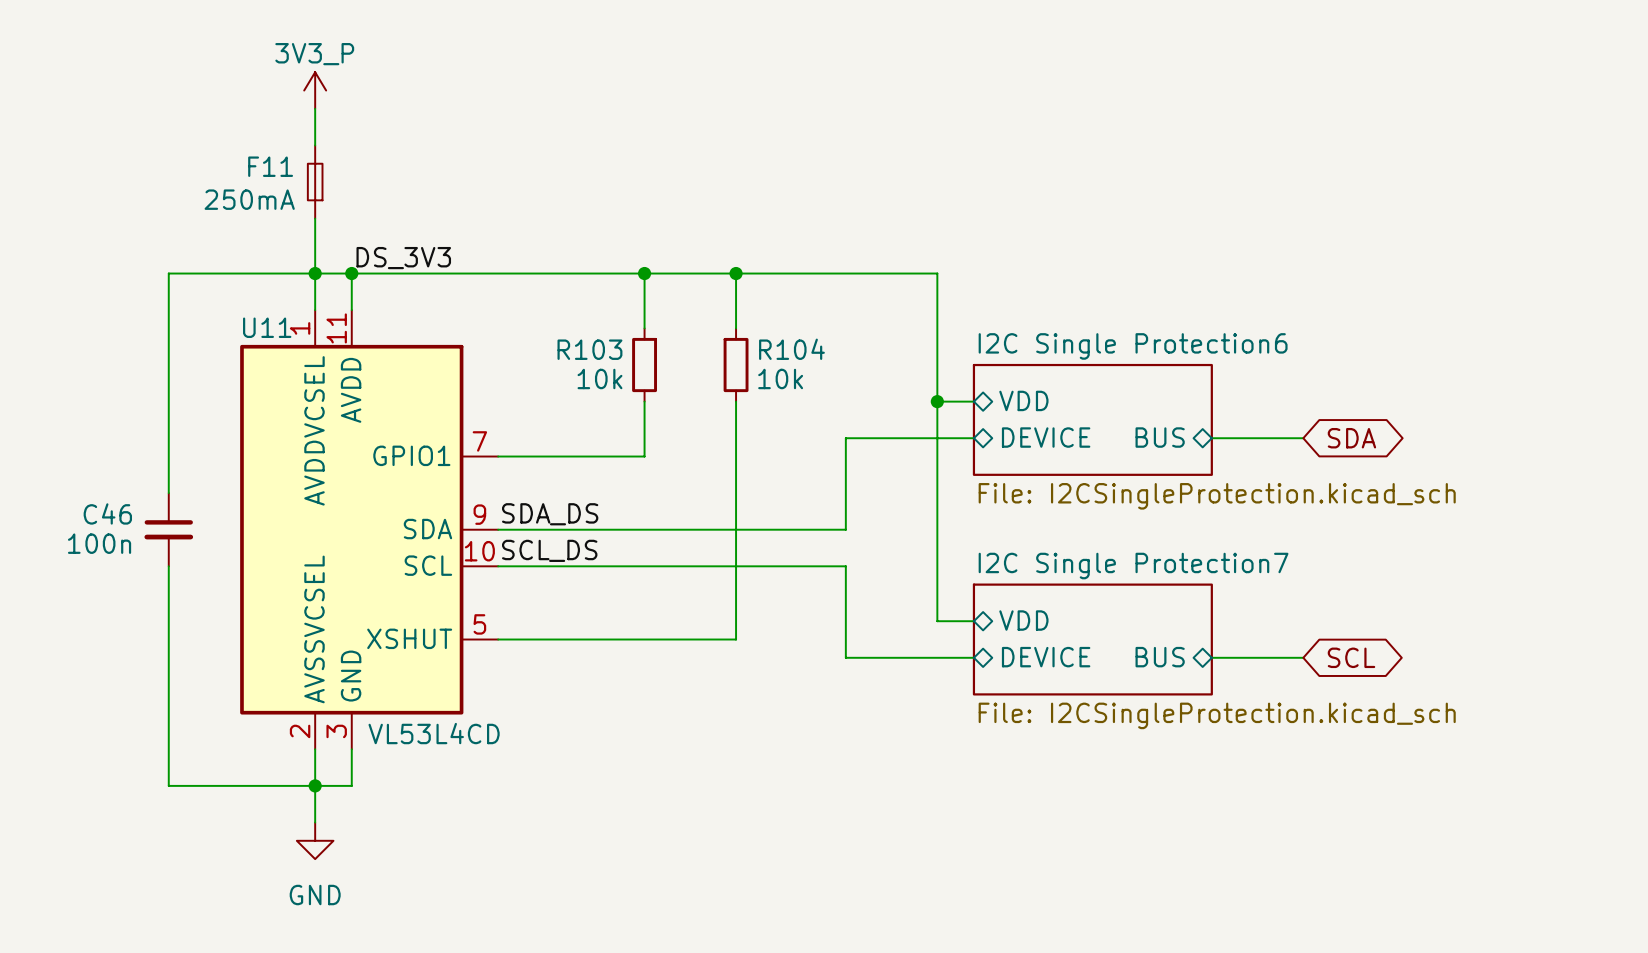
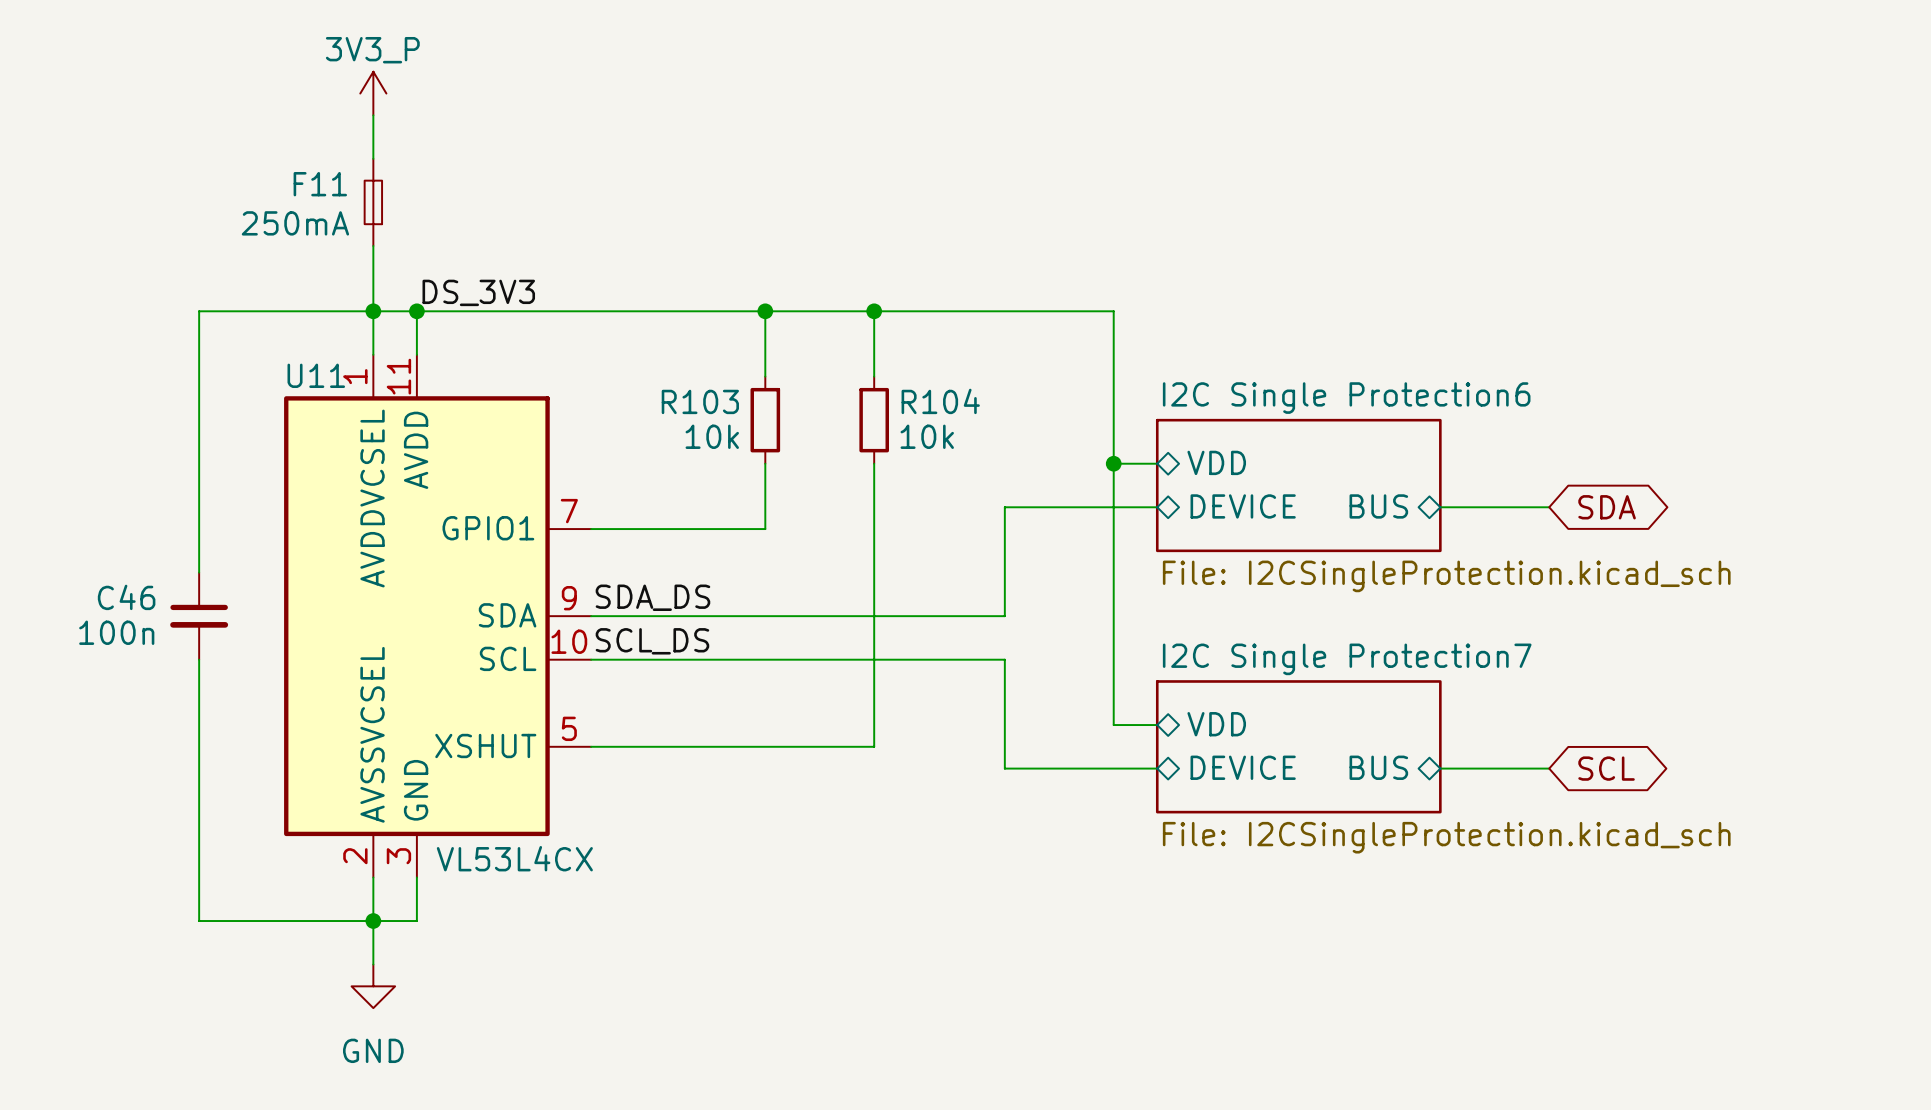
U11 value: VL53L4CD (434, 733) -> VL53L4CX (514, 858)

